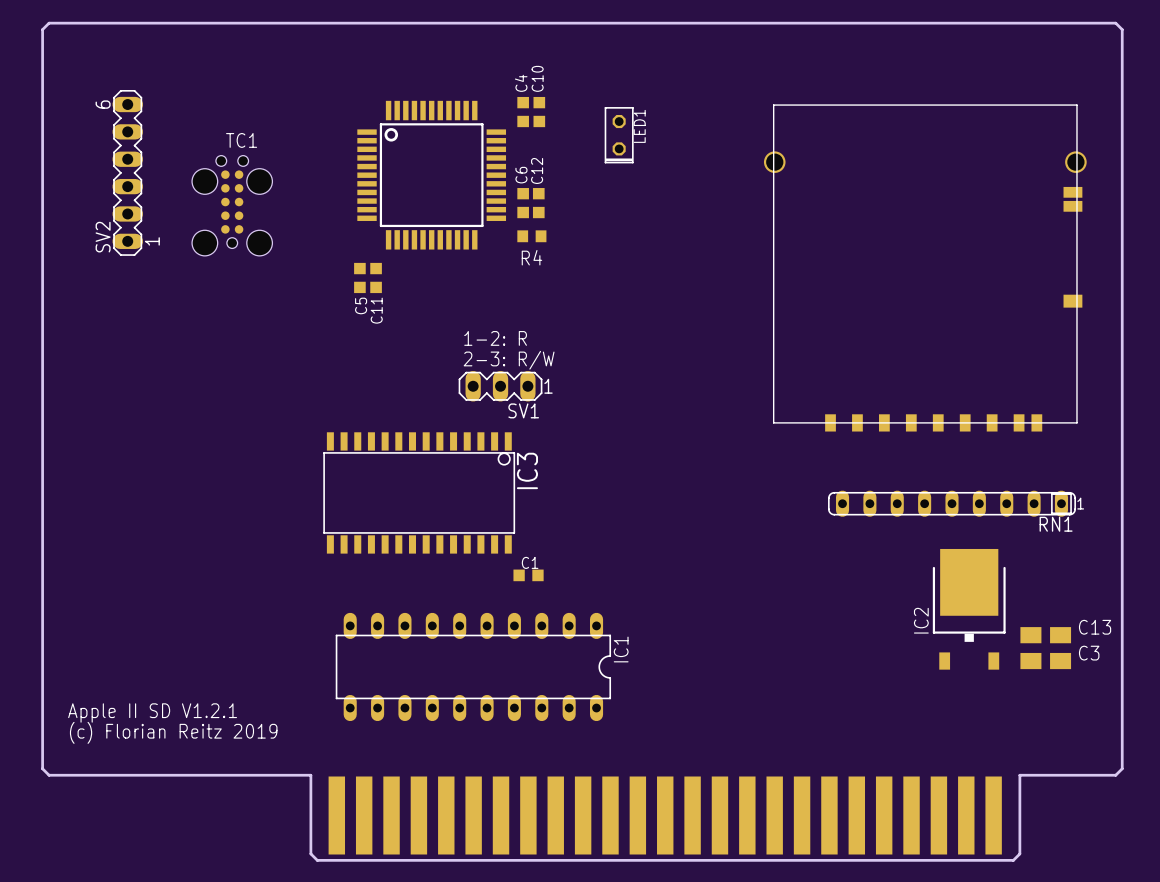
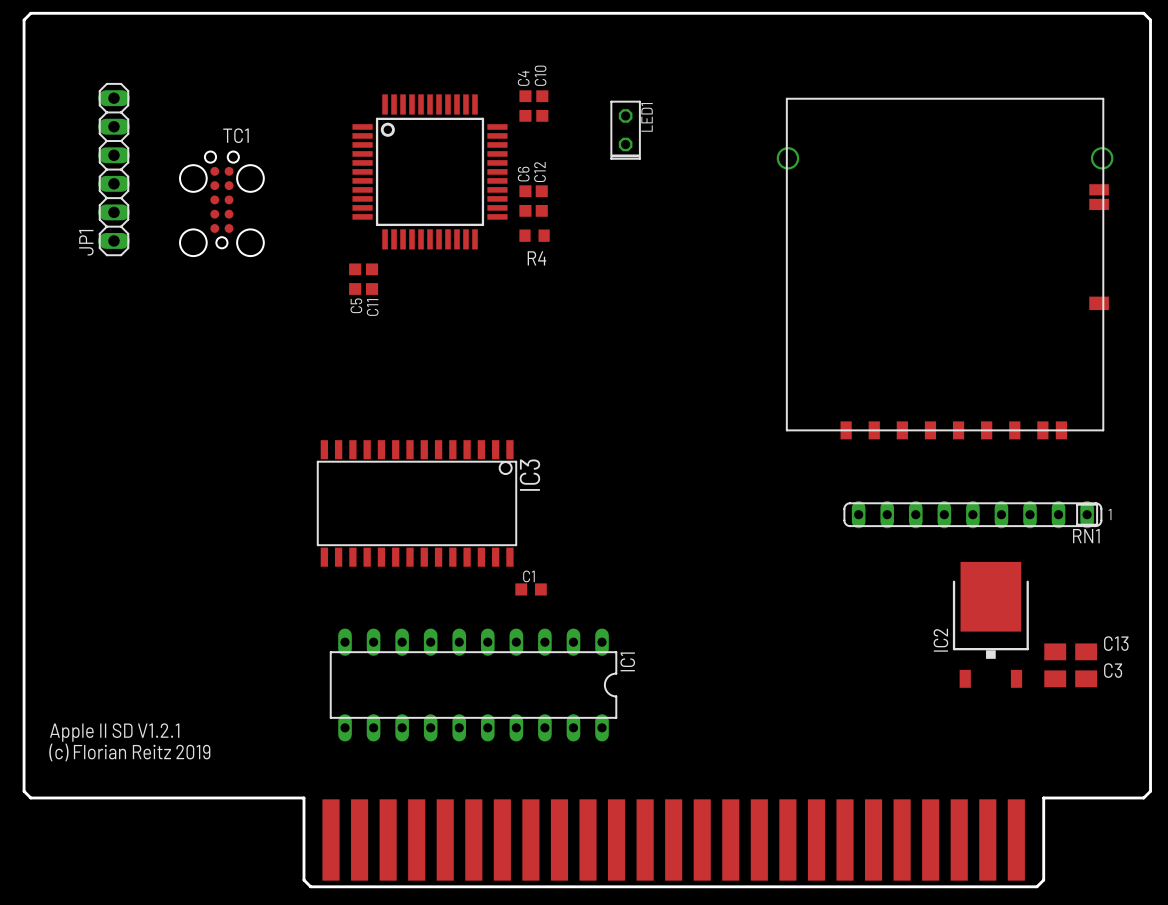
SV2: (127, 172) -> none
JP1: none -> (113, 169)
text: 1-2: R (495, 338) -> none
text: 2-3: R/W (509, 360) -> none
SV1: (500, 386) -> none

